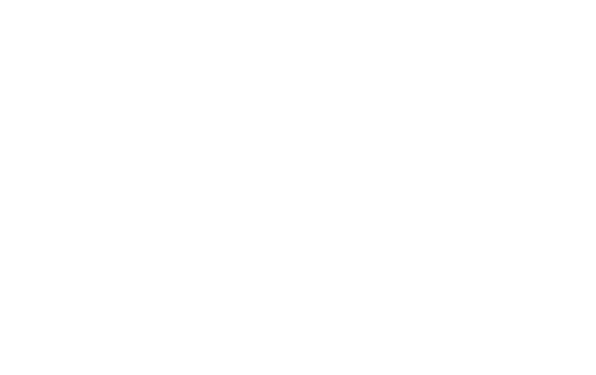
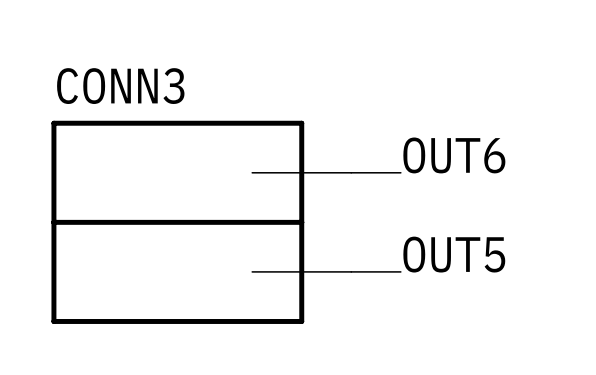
label: none -> OUT6 (454, 155)
wire: none -> (351, 172) (400, 172)
CONN3: none -> (201, 222)
label: none -> OUT5 (454, 254)
wire: none -> (351, 271) (400, 271)

